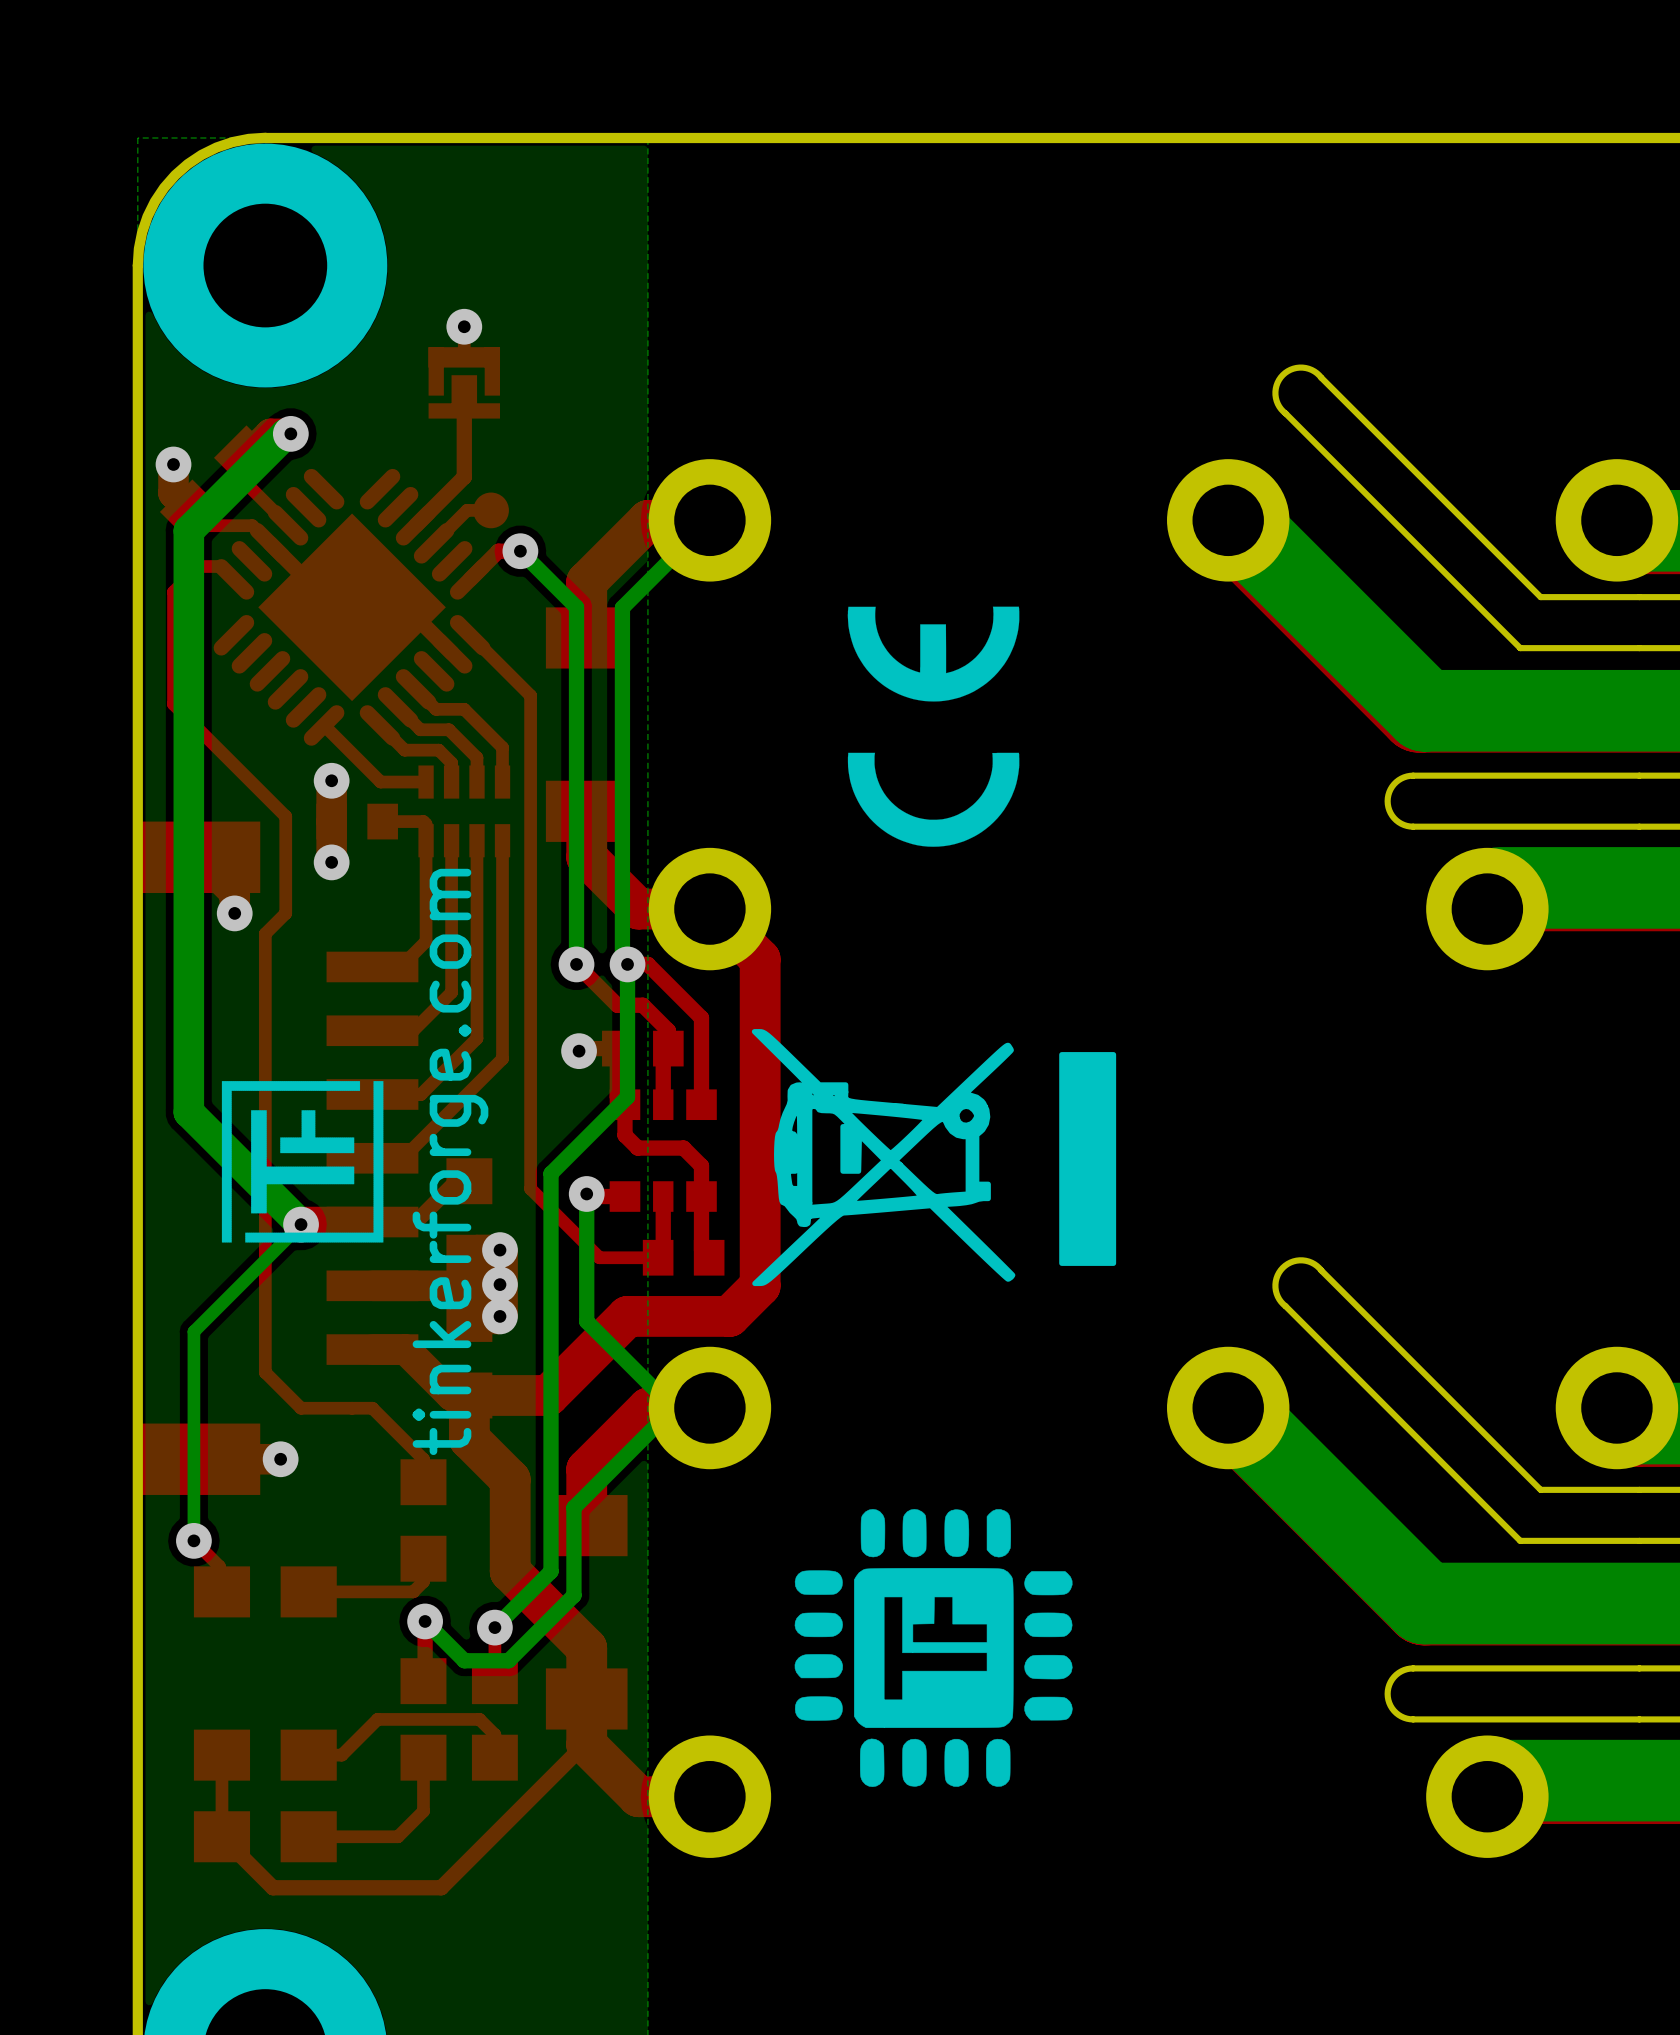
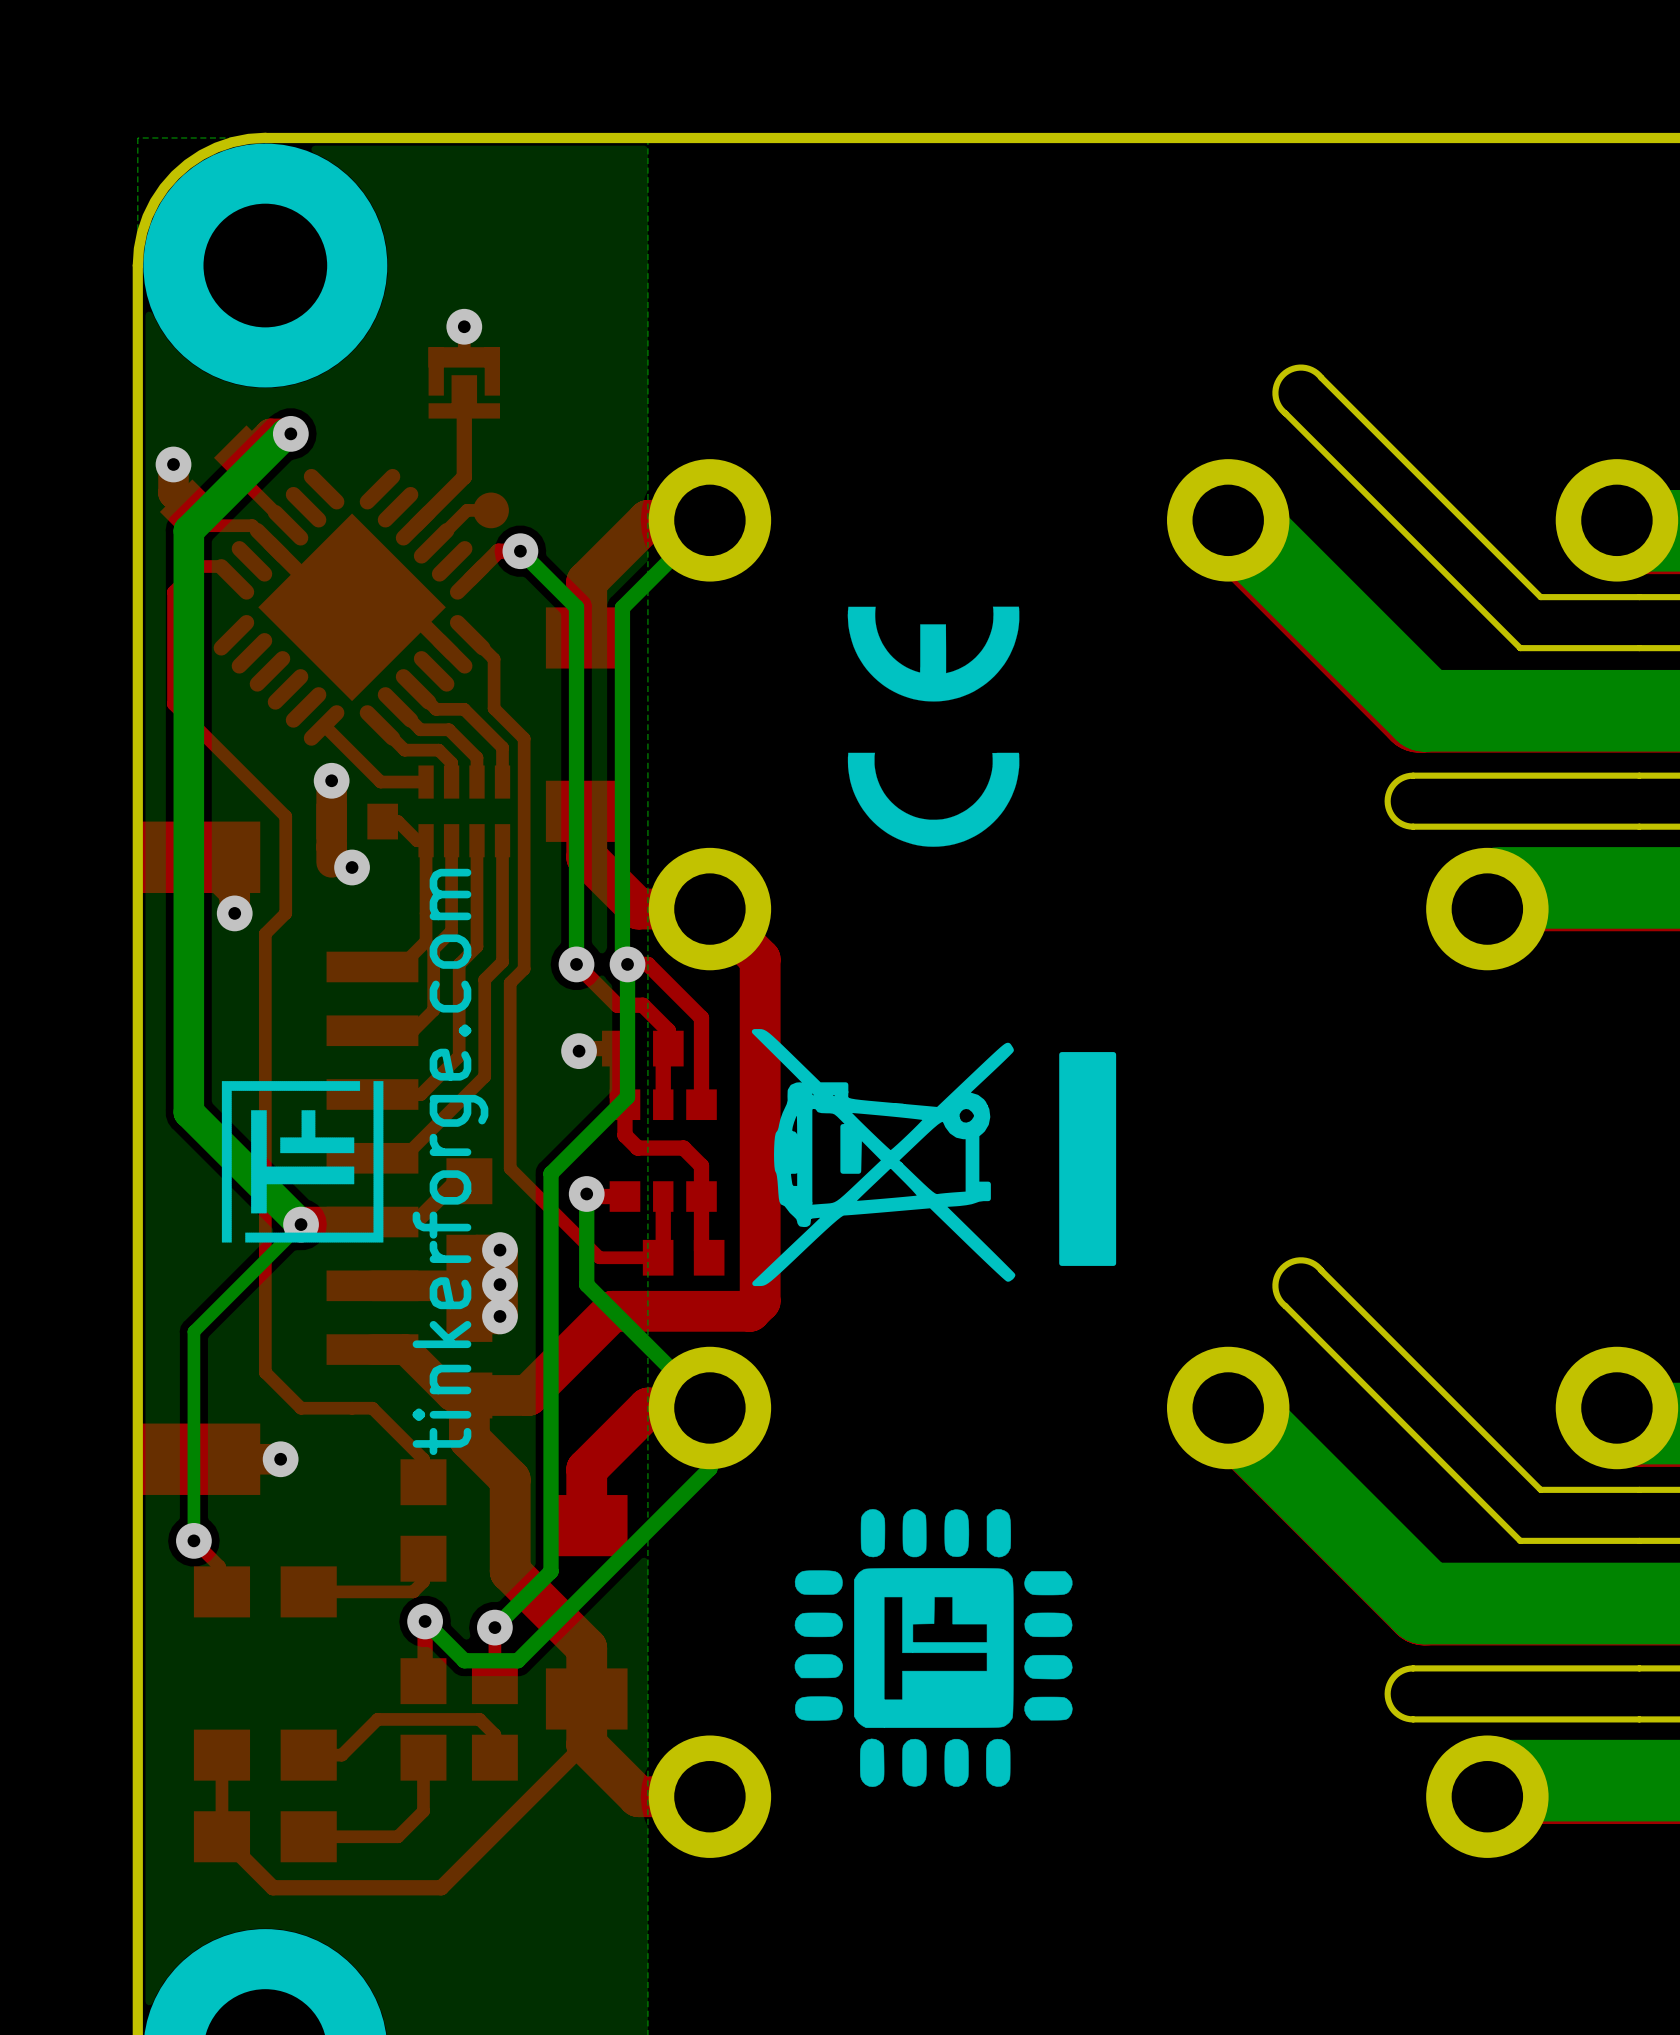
top track: (494, 659) (530, 695) (530, 1188) -> (494, 659) (494, 708) (524, 738) (524, 969) (510, 982) (510, 1168) (530, 1188)
top track: (397, 821) (423, 821) (426, 824) (426, 840) -> (397, 821) (417, 840) (426, 840)
via position: (331, 862) -> (352, 867)
top track: (451, 931) (451, 992) (433, 1010) -> (451, 931) (433, 949) (433, 1010)
top track: (476, 946) (476, 1038) (459, 1056) -> (476, 946) (459, 964) (459, 1056)
top track: (502, 961) (502, 1058) (484, 1076) -> (502, 961) (484, 979) (484, 1076)
bottom track: (586, 1284) (586, 1321) (673, 1407) (709, 1407) -> (586, 1284) (705, 1403)
top track: (760, 1285) (729, 1316) (627, 1316) (548, 1395) (528, 1395) -> (760, 1285) (760, 1301) (749, 1311) (612, 1311) (528, 1395)
bottom track: (705, 1403) (678, 1403) (573, 1507) (573, 1595) (508, 1660) -> (709, 1407) (709, 1468) (517, 1660) (508, 1660)

